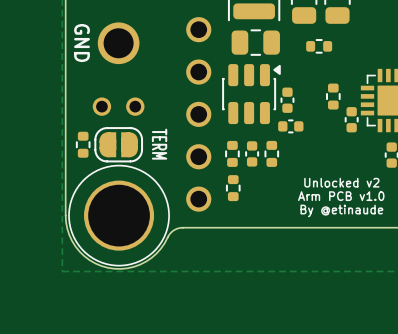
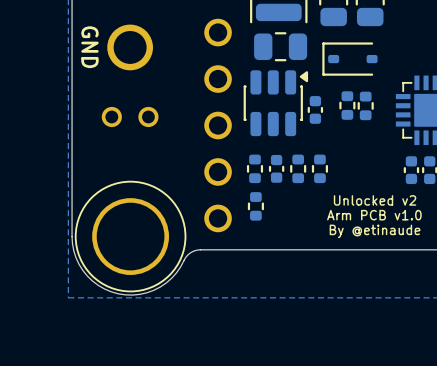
part footprint: [306, 39, 333, 54] -> [322, 42, 378, 76]
part: none -> (347, 105)
part position: (351, 119) -> (411, 170)
part: (290, 126) -> none
part: (83, 144) -> none
part: (118, 144) -> none
text: TERM (159, 144) -> none
part: none -> (319, 168)

